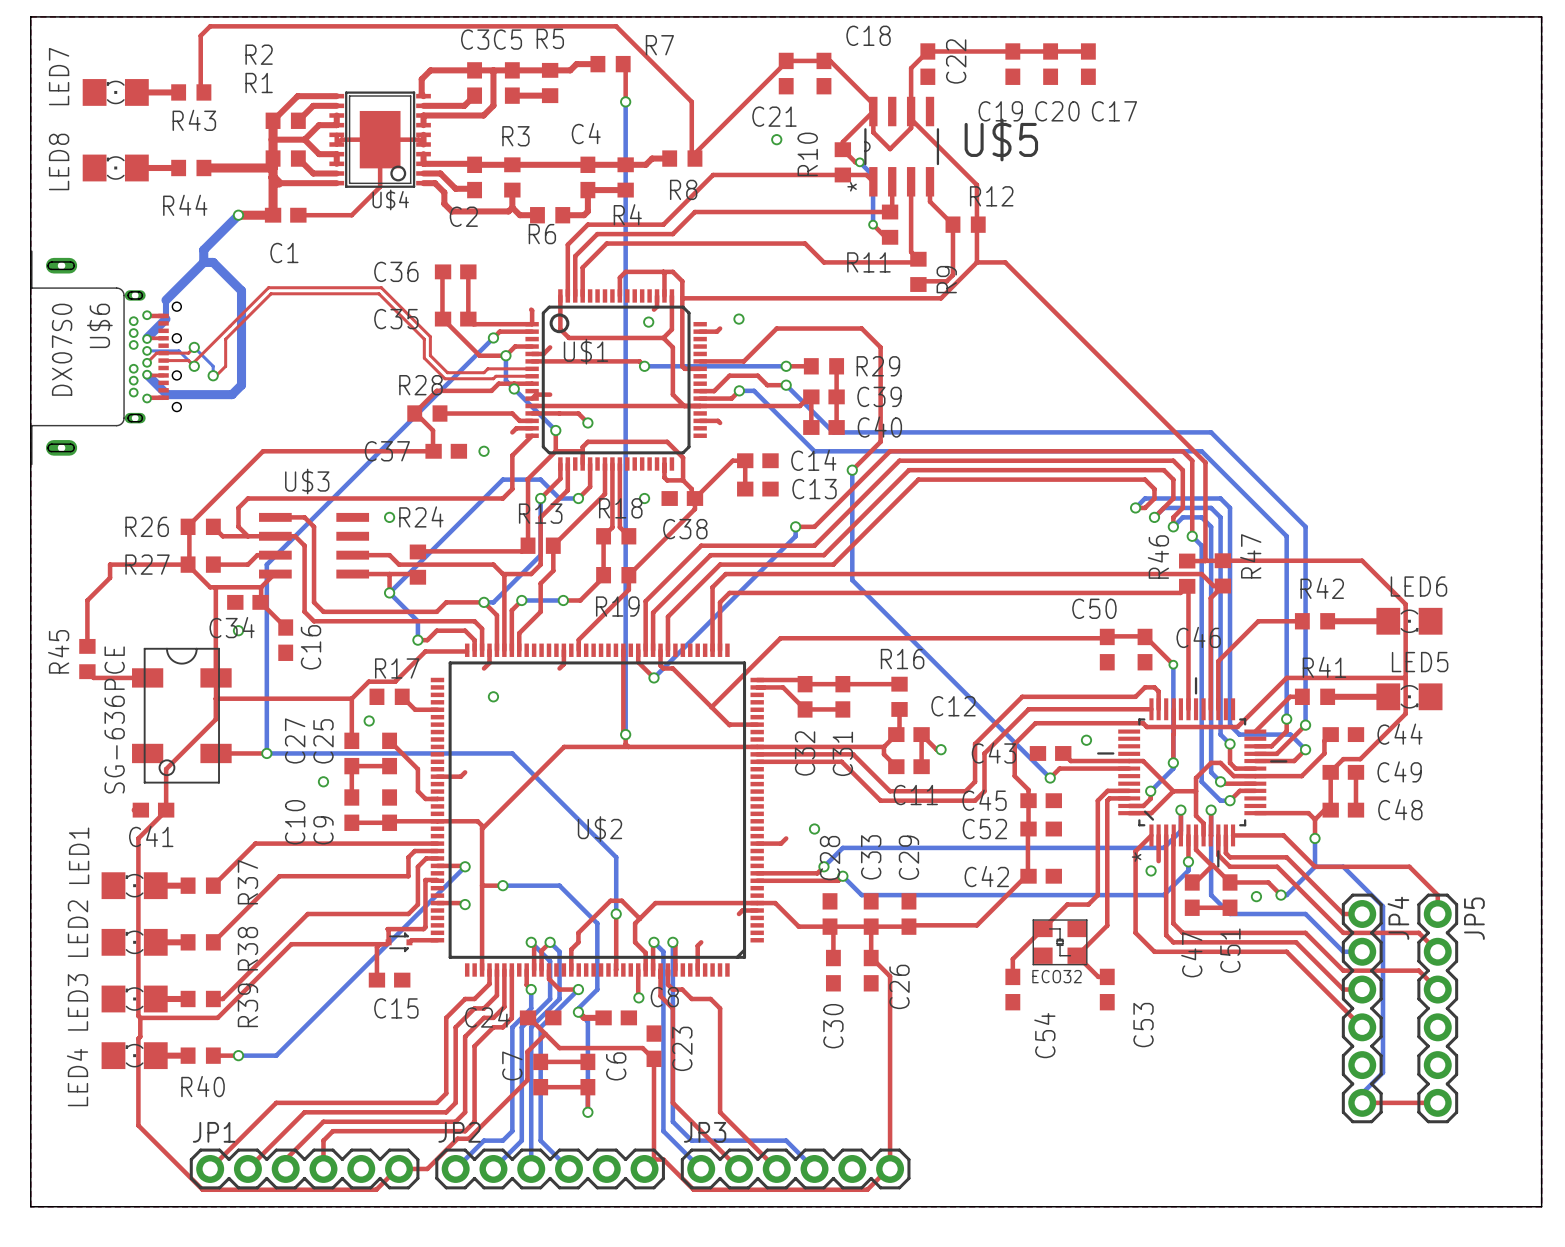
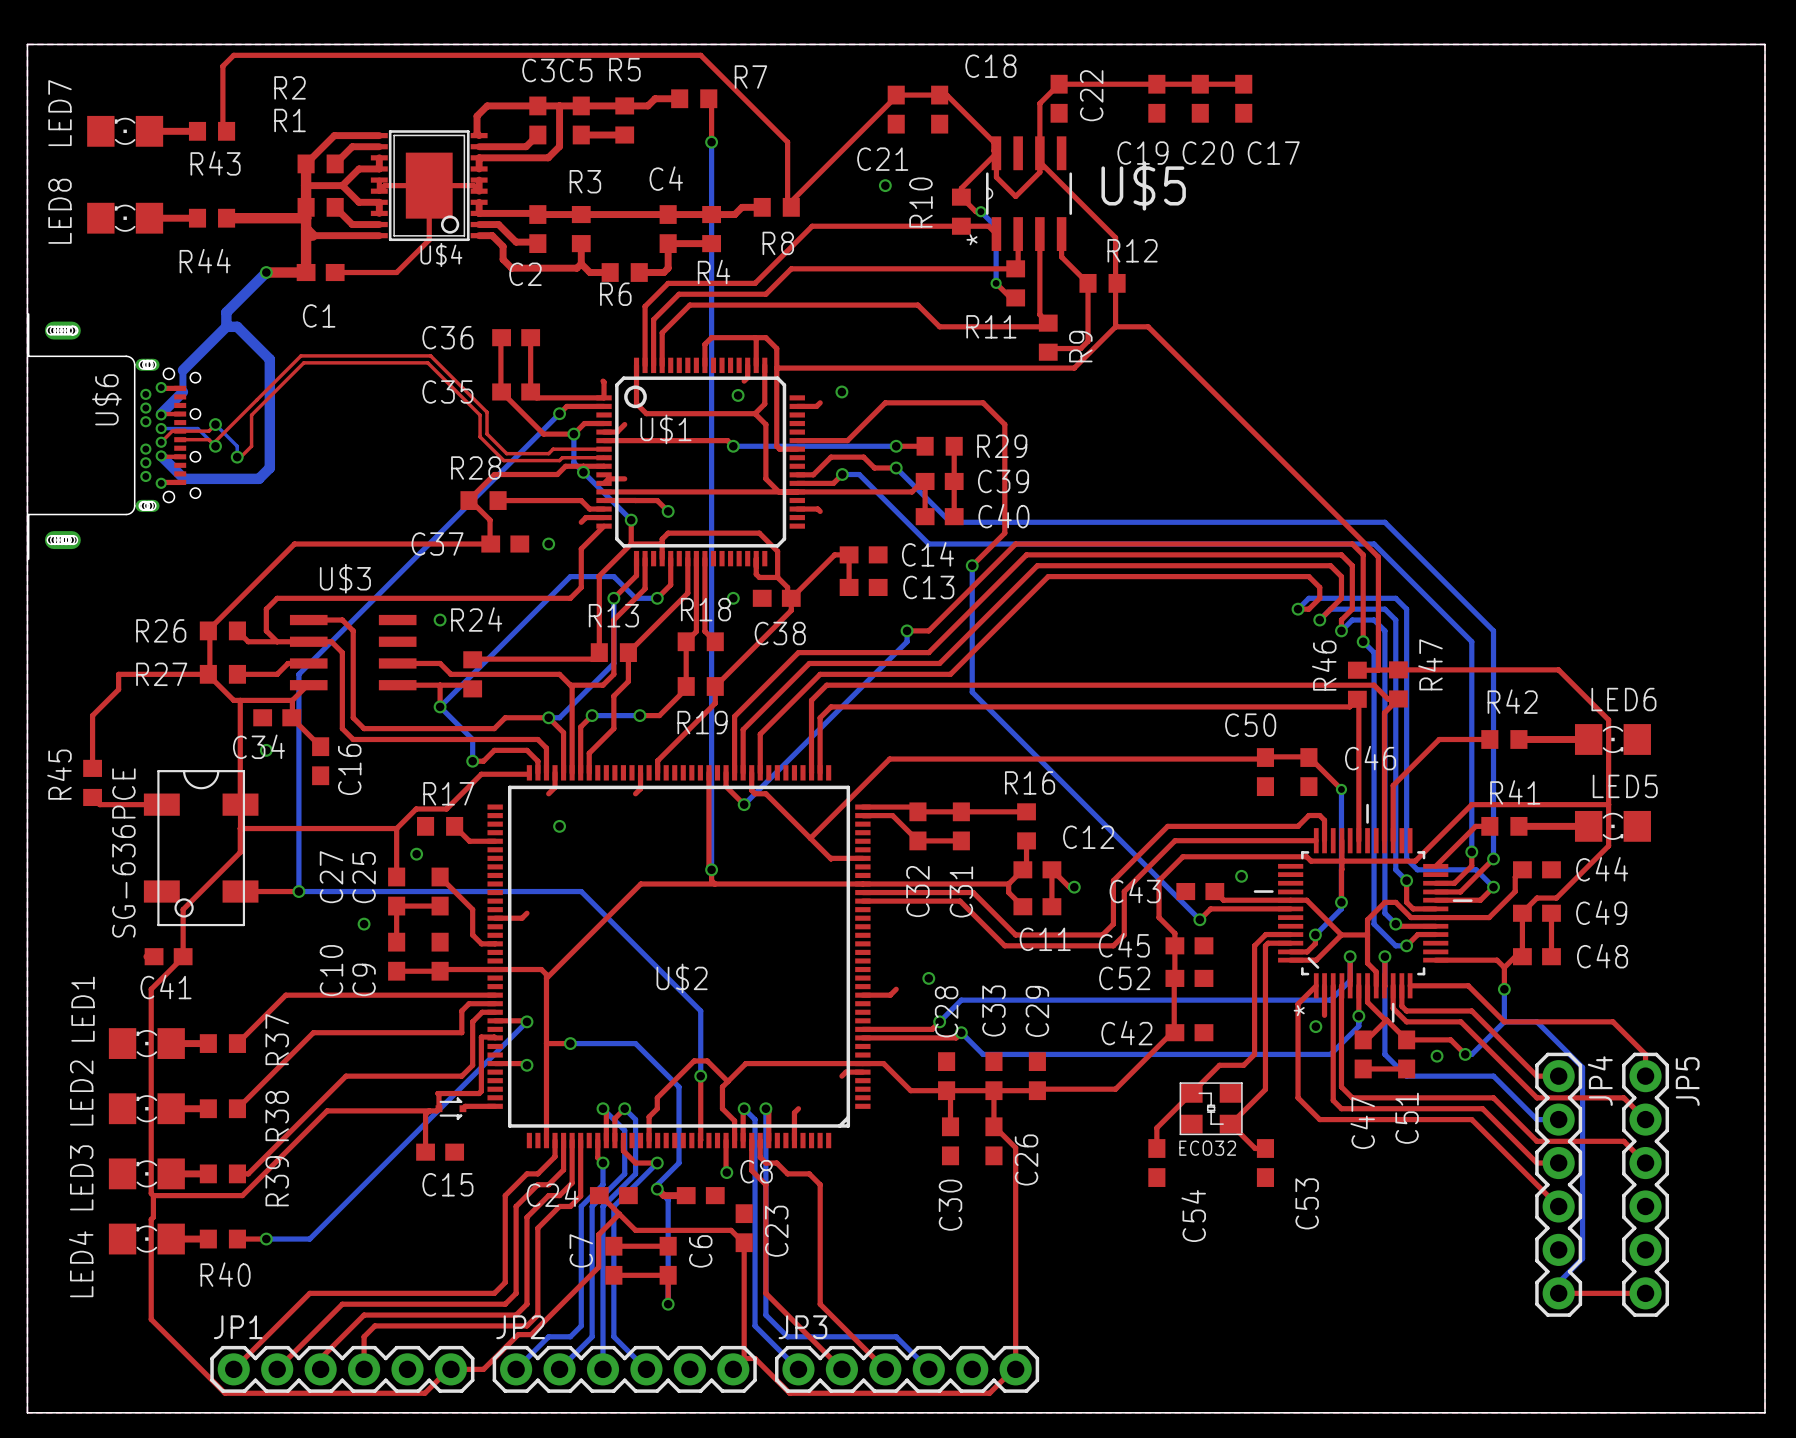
U$6 footprint: [31, 251, 182, 465] -> [28, 313, 201, 560]
U$6 value: DX07S0 (62, 349) -> none

